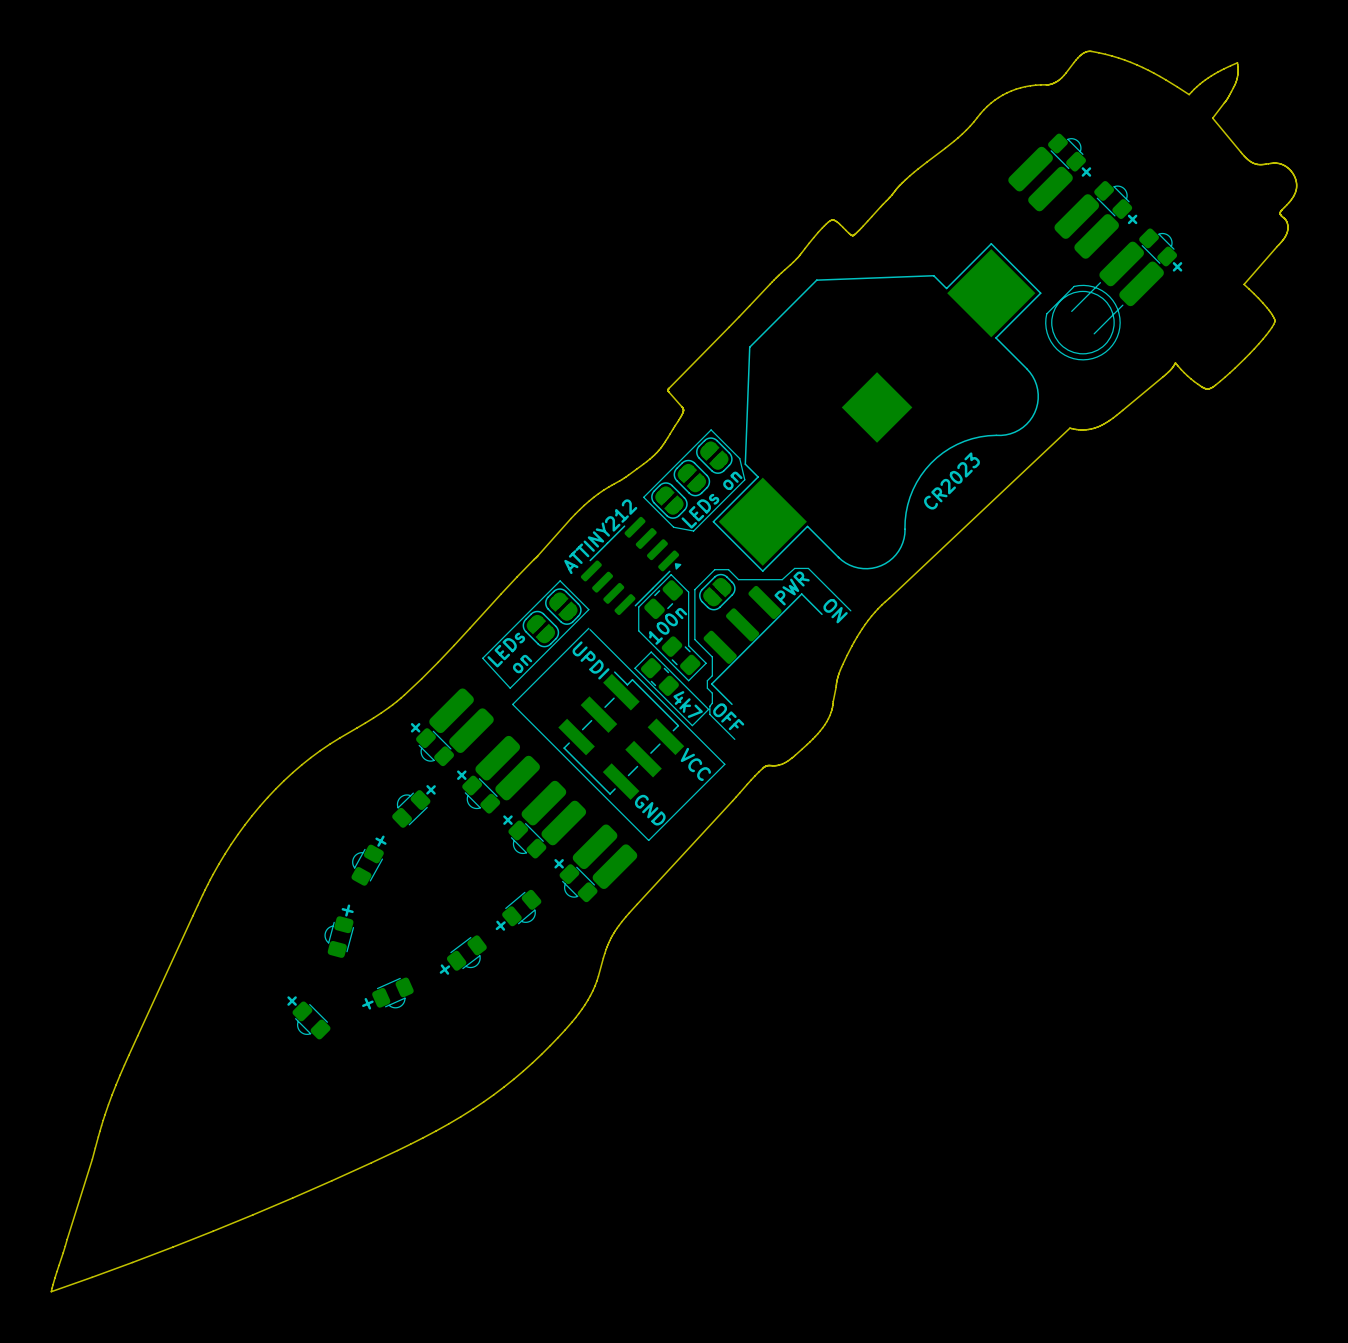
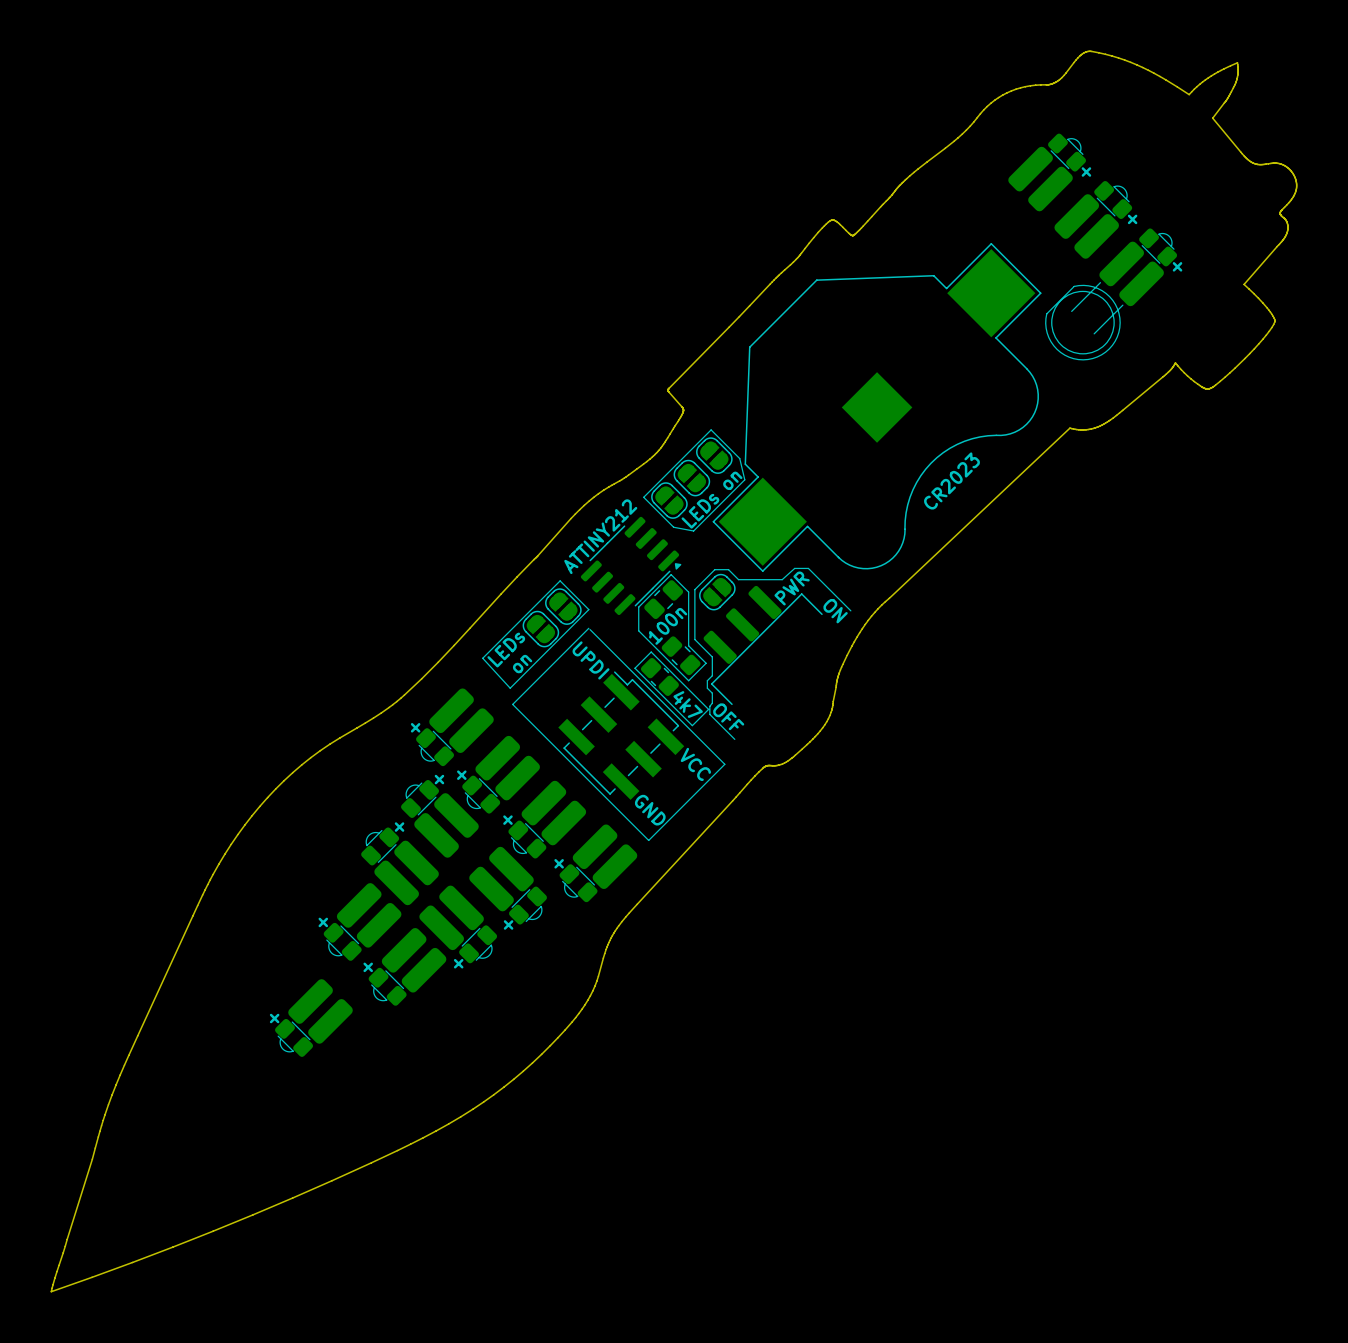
part: (414, 806) -> none
part: none -> (439, 816)
part: (369, 860) -> none
part: none -> (400, 863)
part: none -> (508, 888)
part: (518, 910) -> none
part: none -> (359, 921)
part: none -> (458, 927)
part: (339, 931) -> none
part: (463, 955) -> none
part: none -> (404, 966)
part: (387, 993) -> none
part footprint: [287, 996, 331, 1040] -> [269, 979, 353, 1057]

